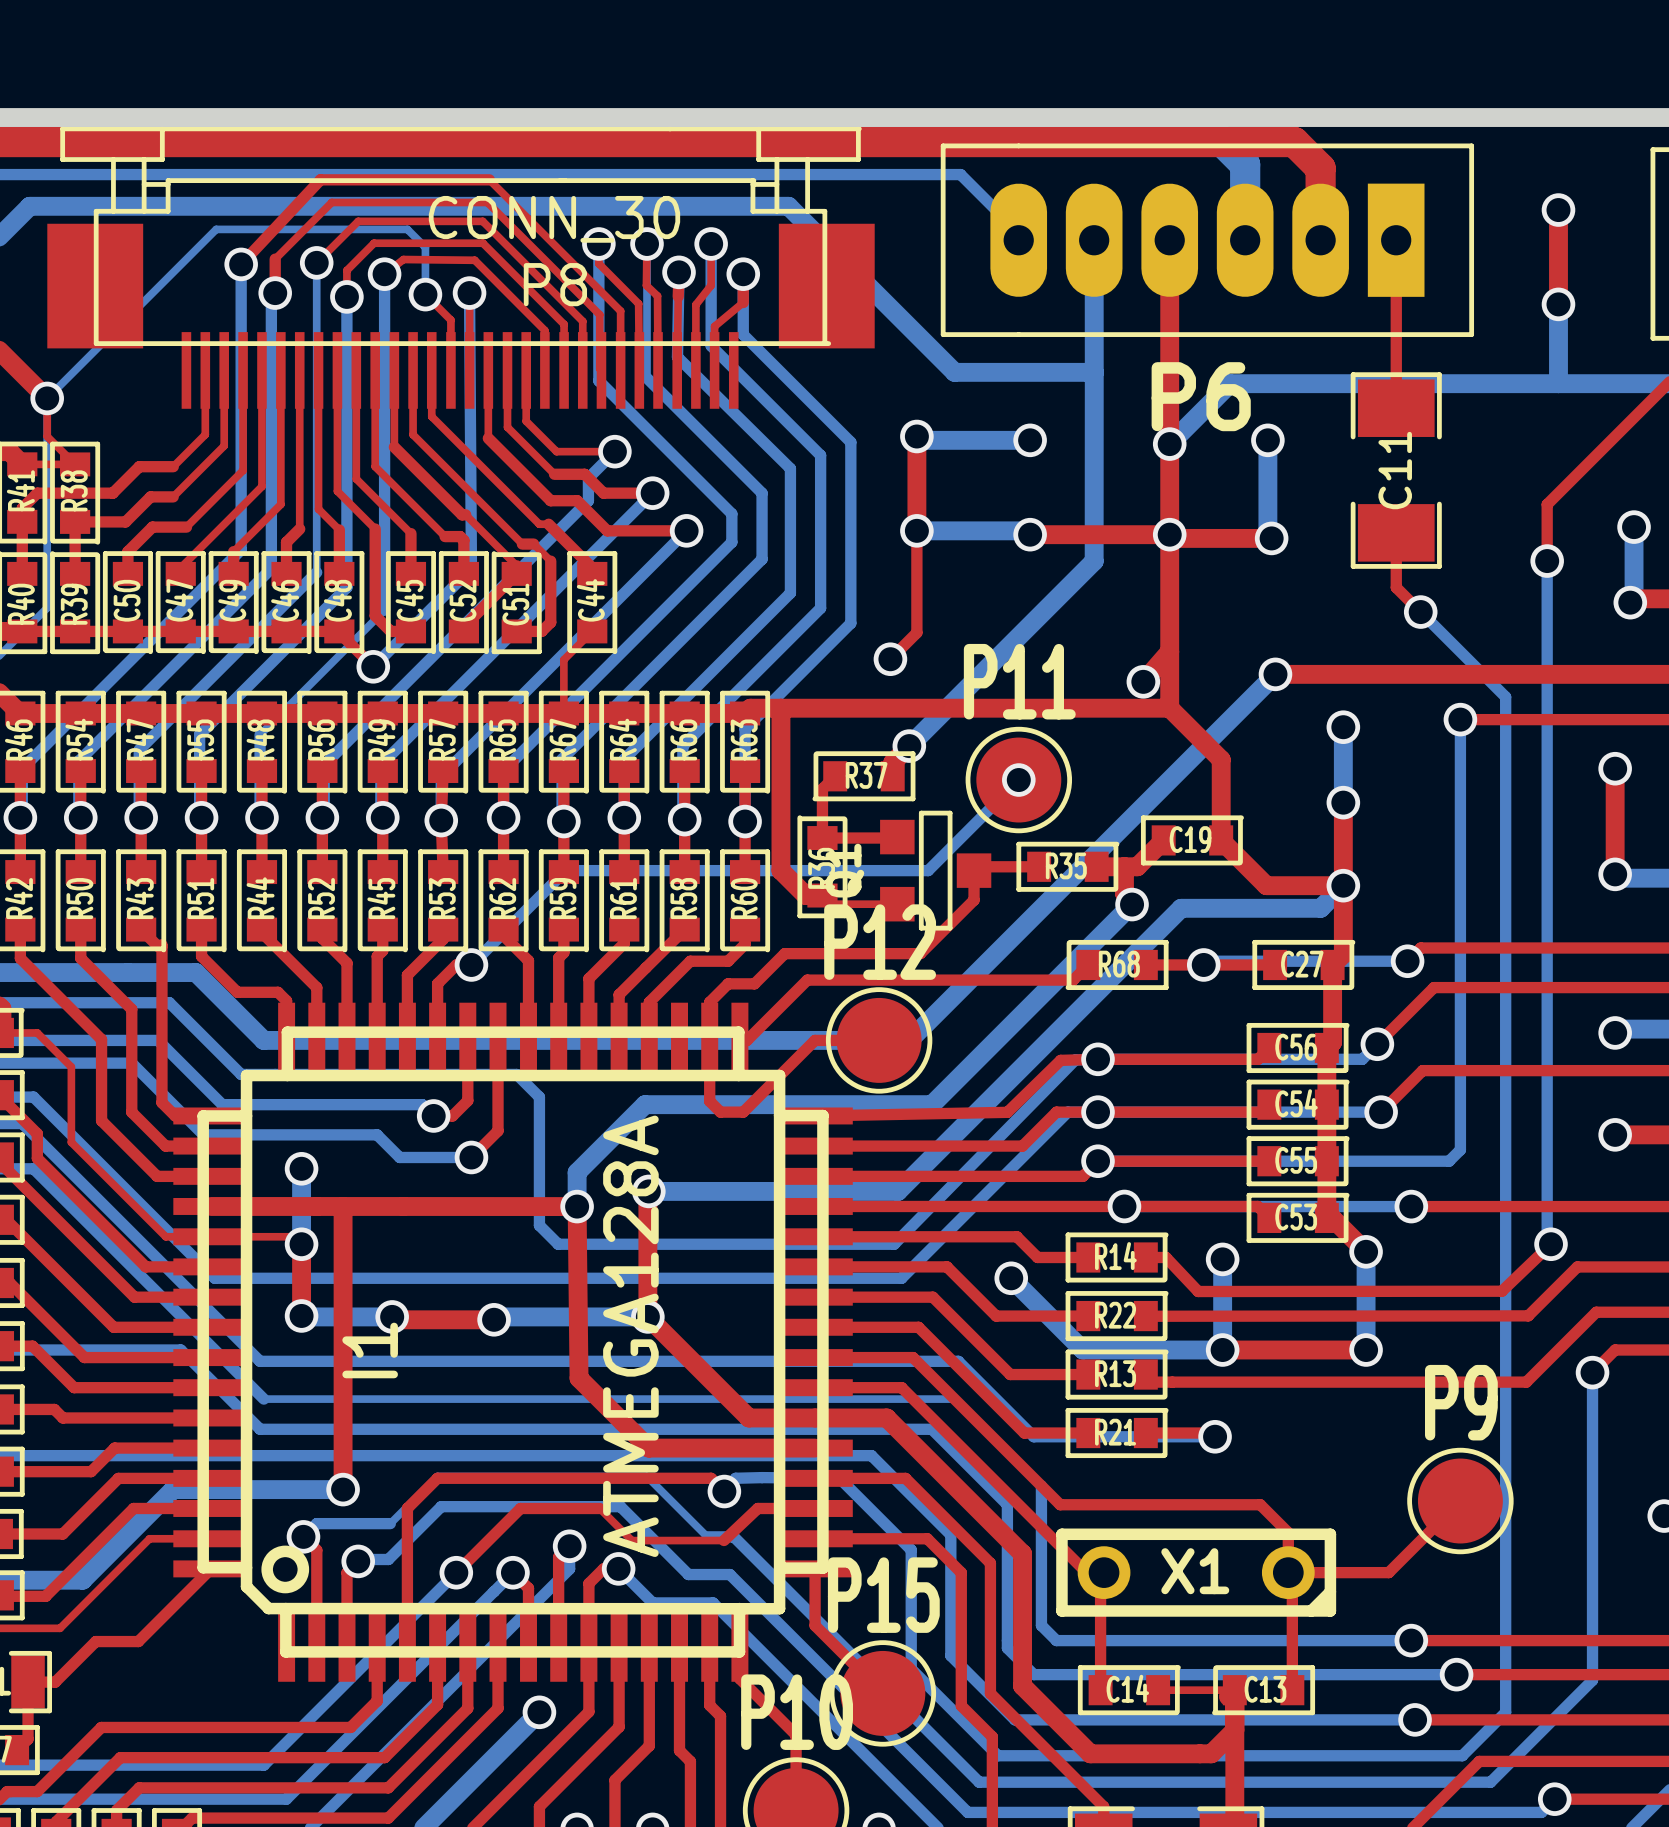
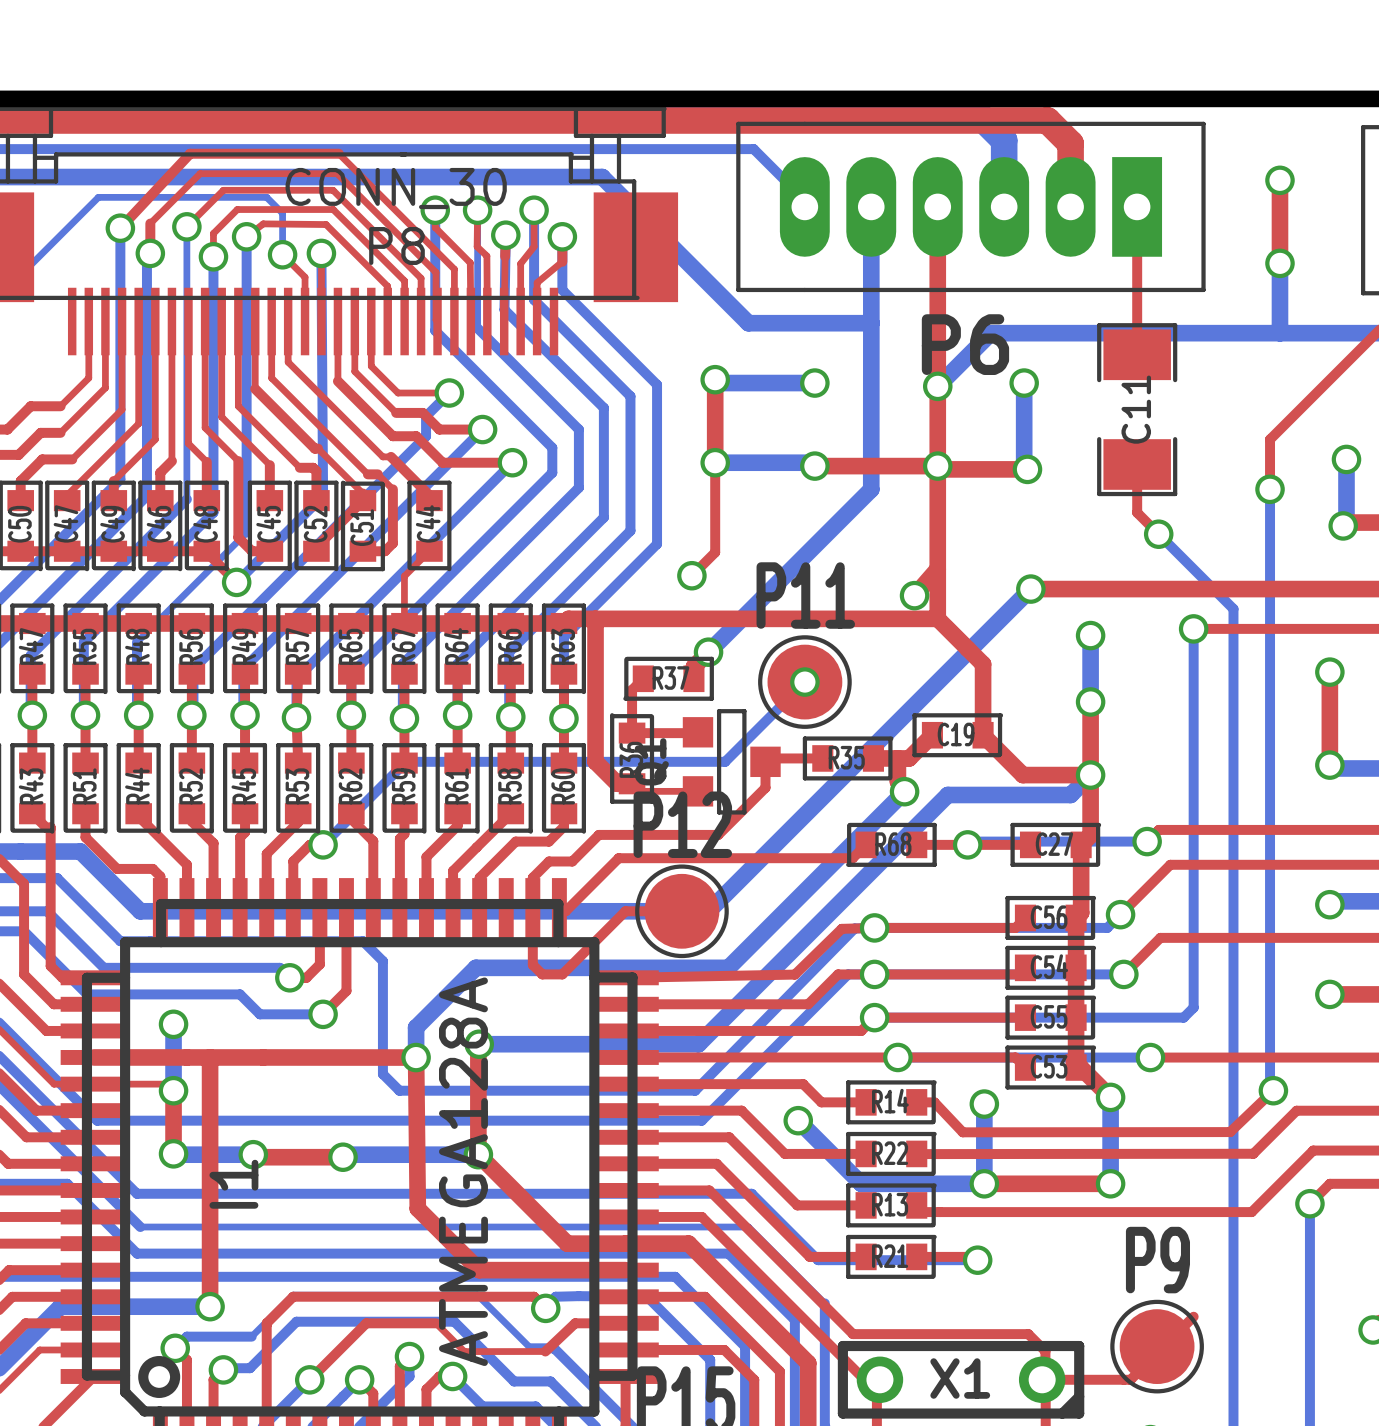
top track: (910, 1357) (913, 1357) (1060, 1504) (1260, 1504) (1288, 1532) (1288, 1572) -> (709, 1190) (853, 1334) (1028, 1334) (1045, 1351) (1045, 1379)
P9 position: (1460, 1501) -> (1157, 1346)

